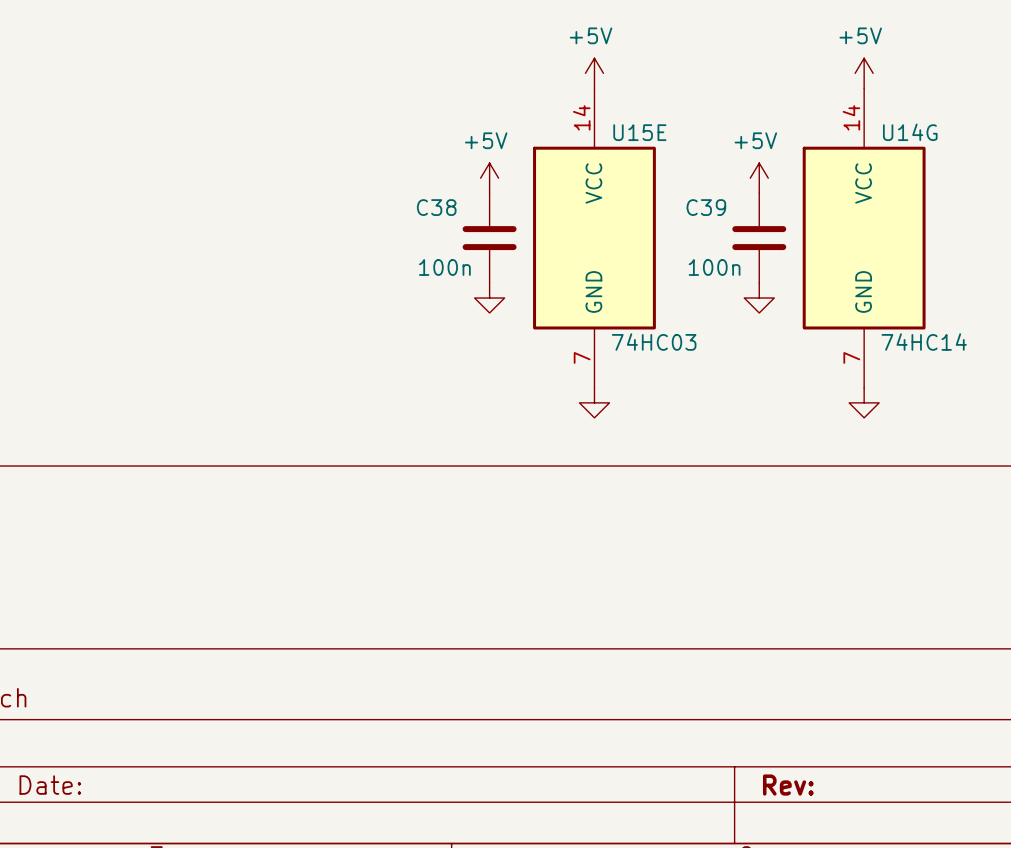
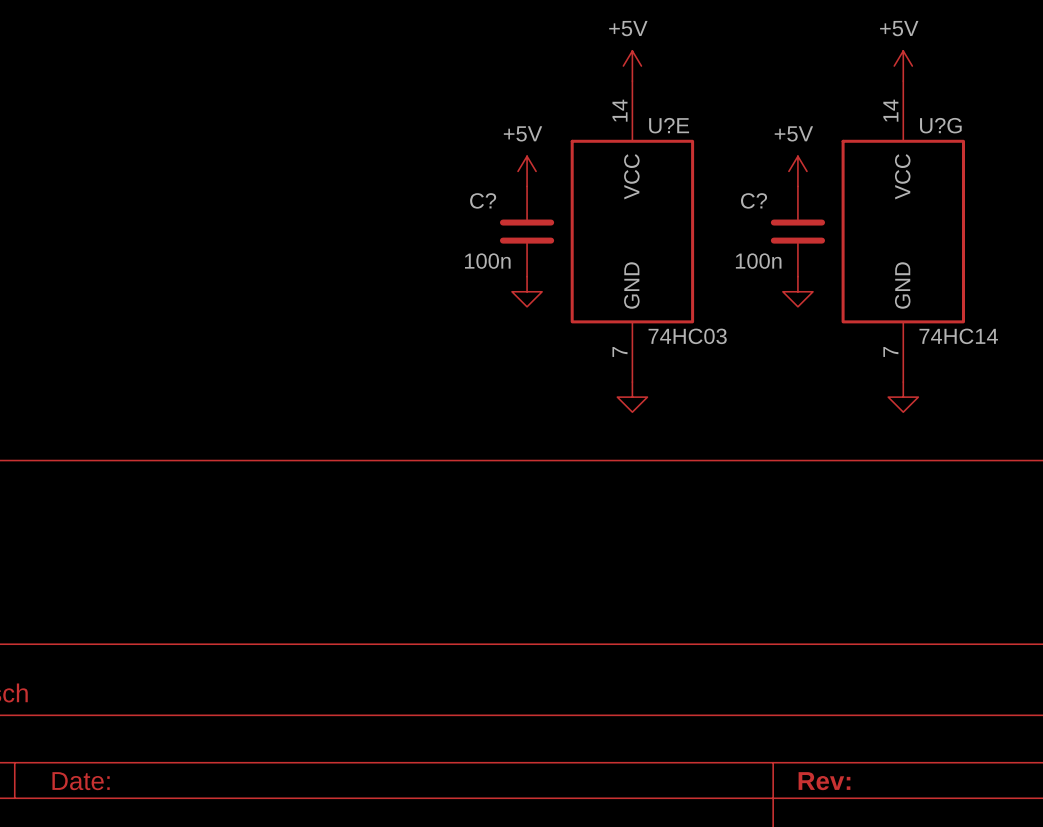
U15E name: U15E (639, 132) -> U?E (669, 125)
U14G name: U14G (910, 132) -> U?G (940, 125)
C38 name: C38 (436, 207) -> C? (483, 200)
C39 name: C39 (706, 207) -> C? (754, 200)

